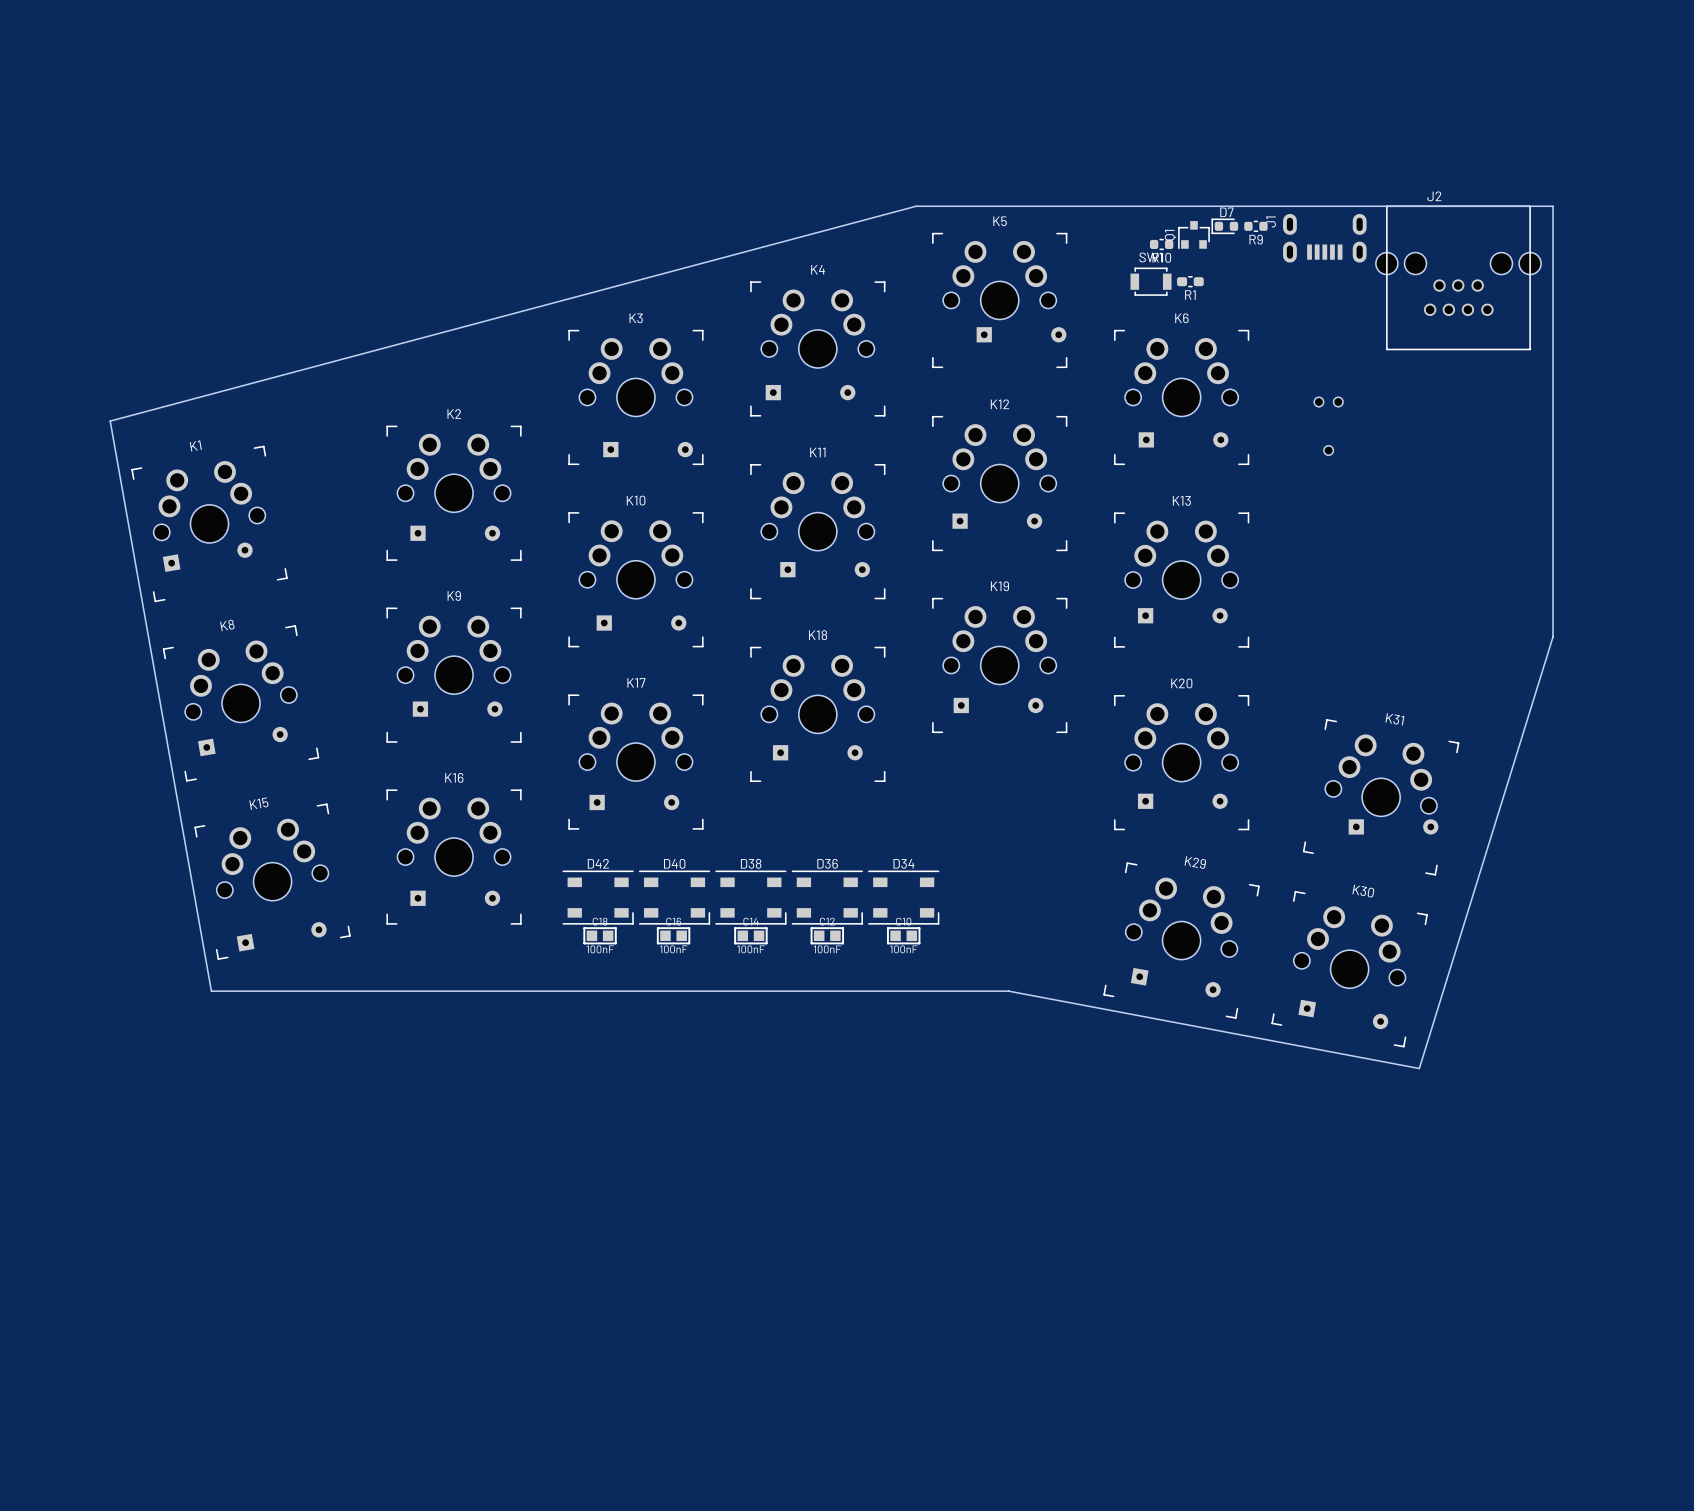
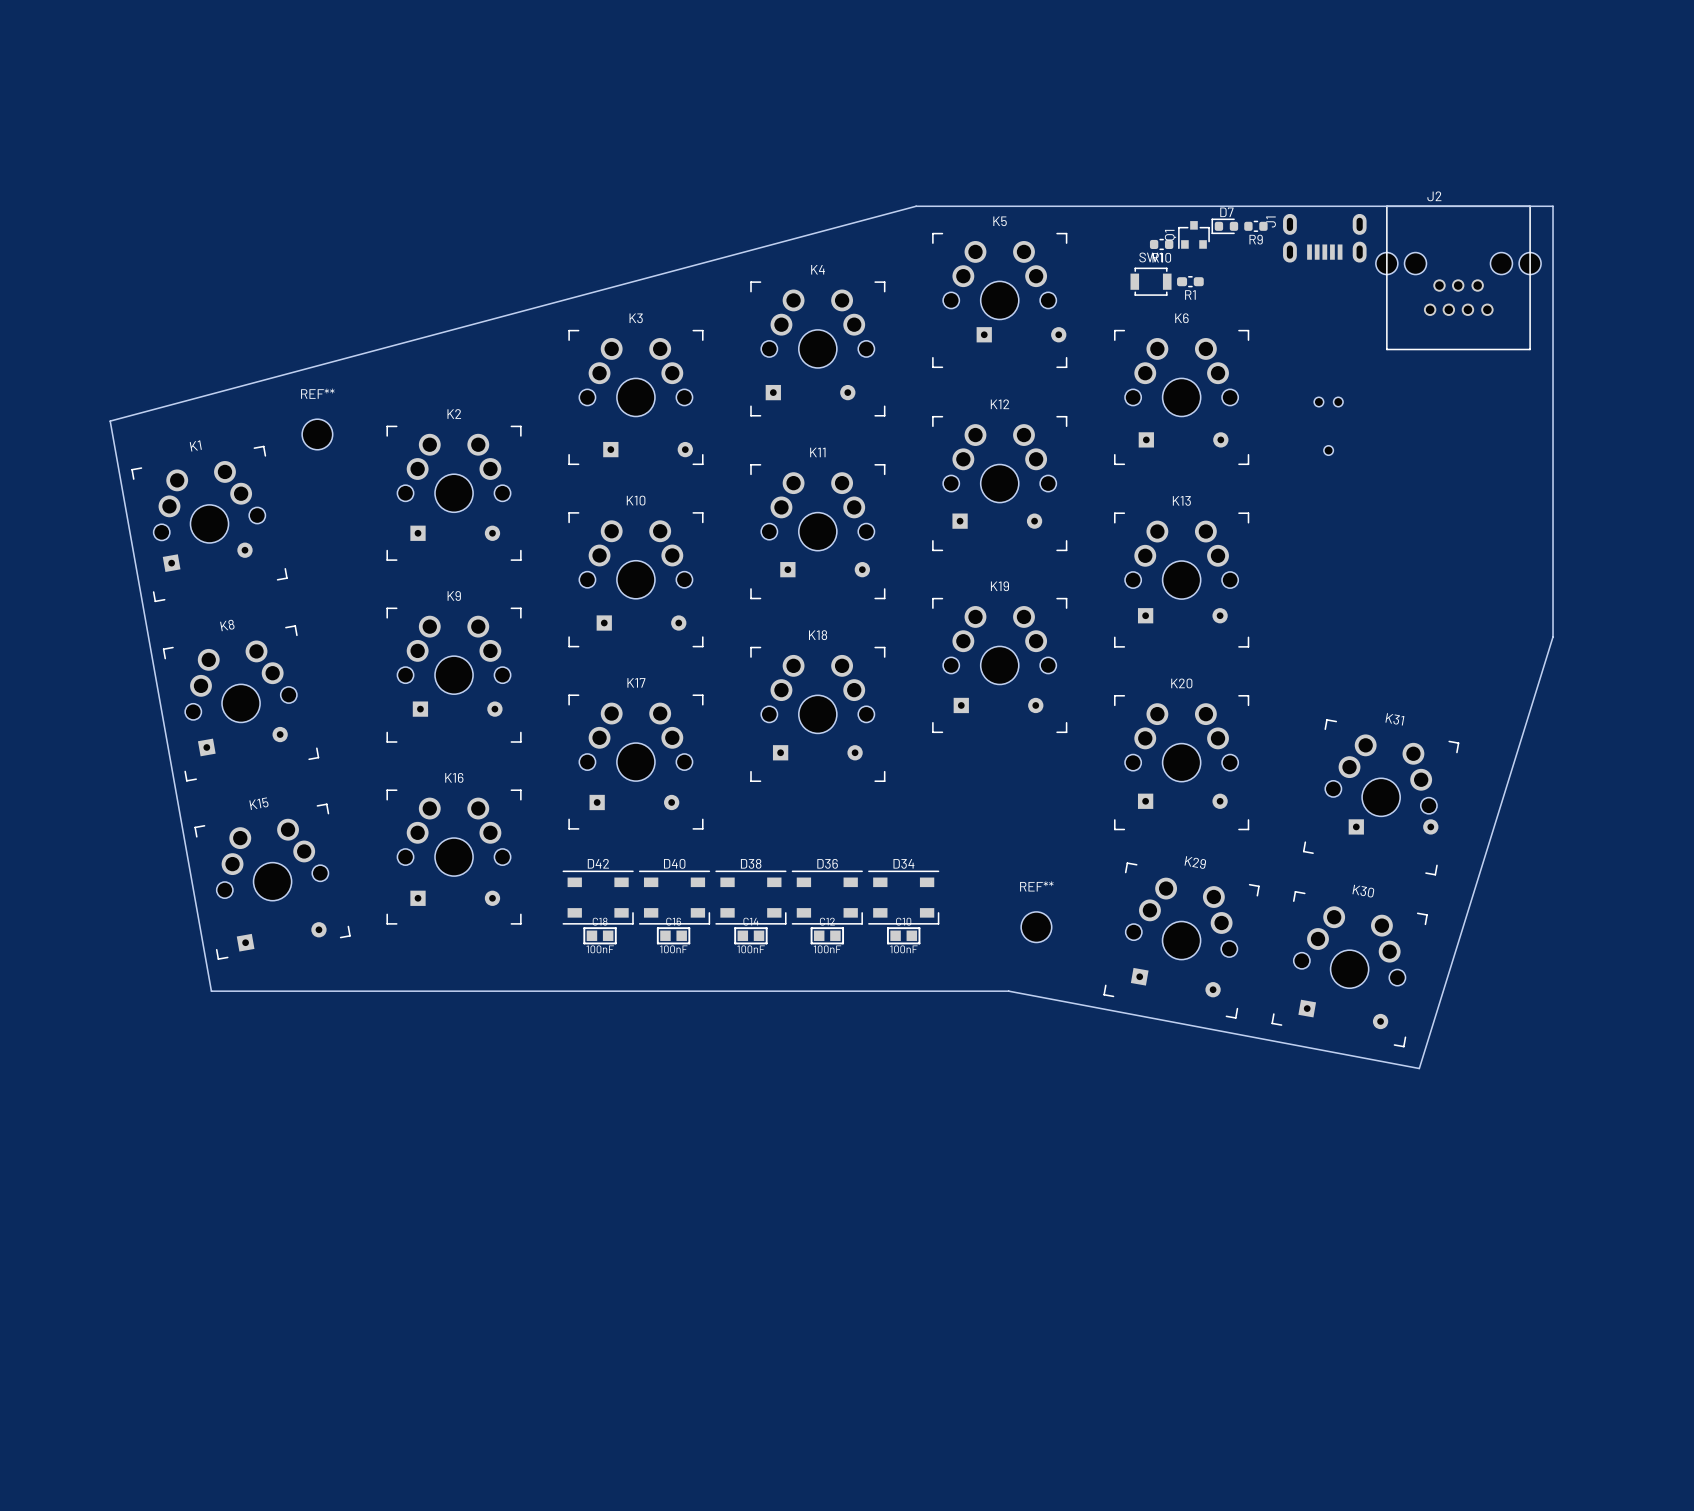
REF**: none -> (317, 434)
REF**: none -> (1036, 927)

